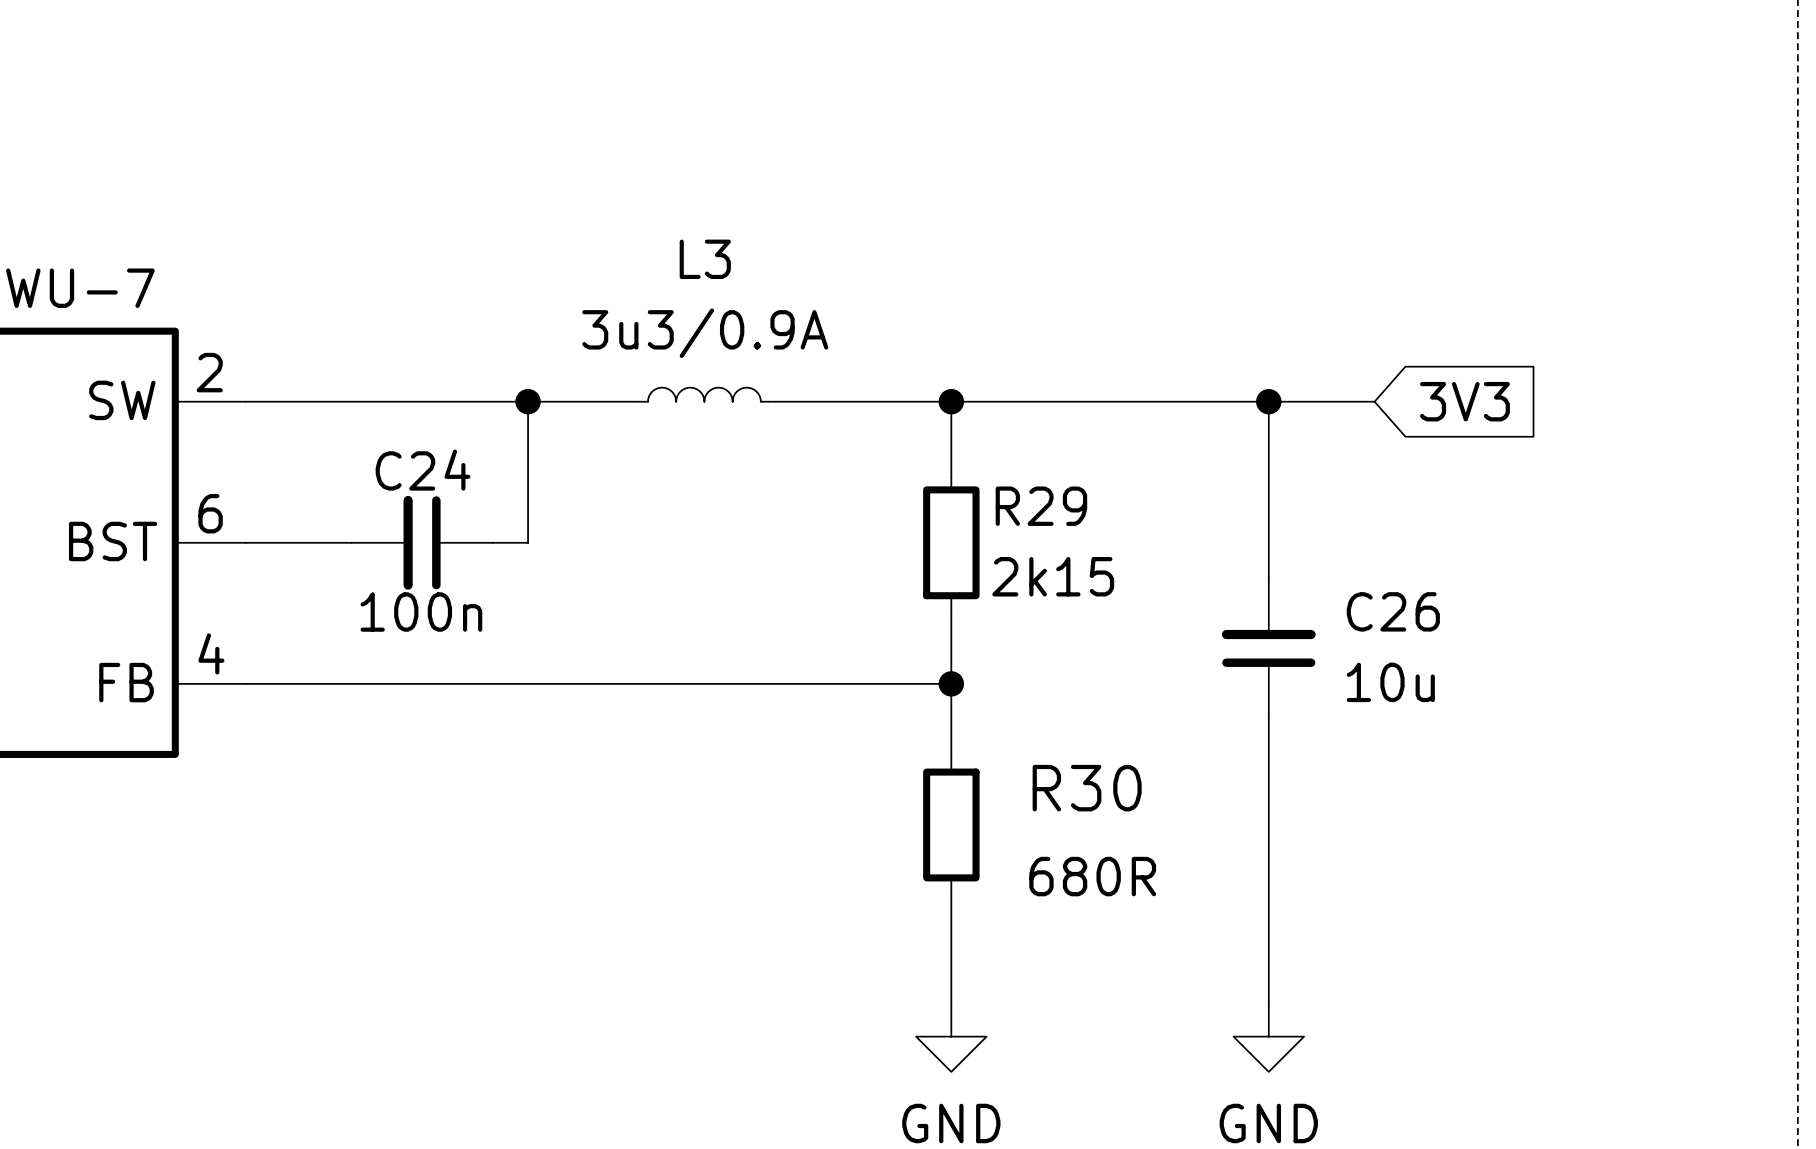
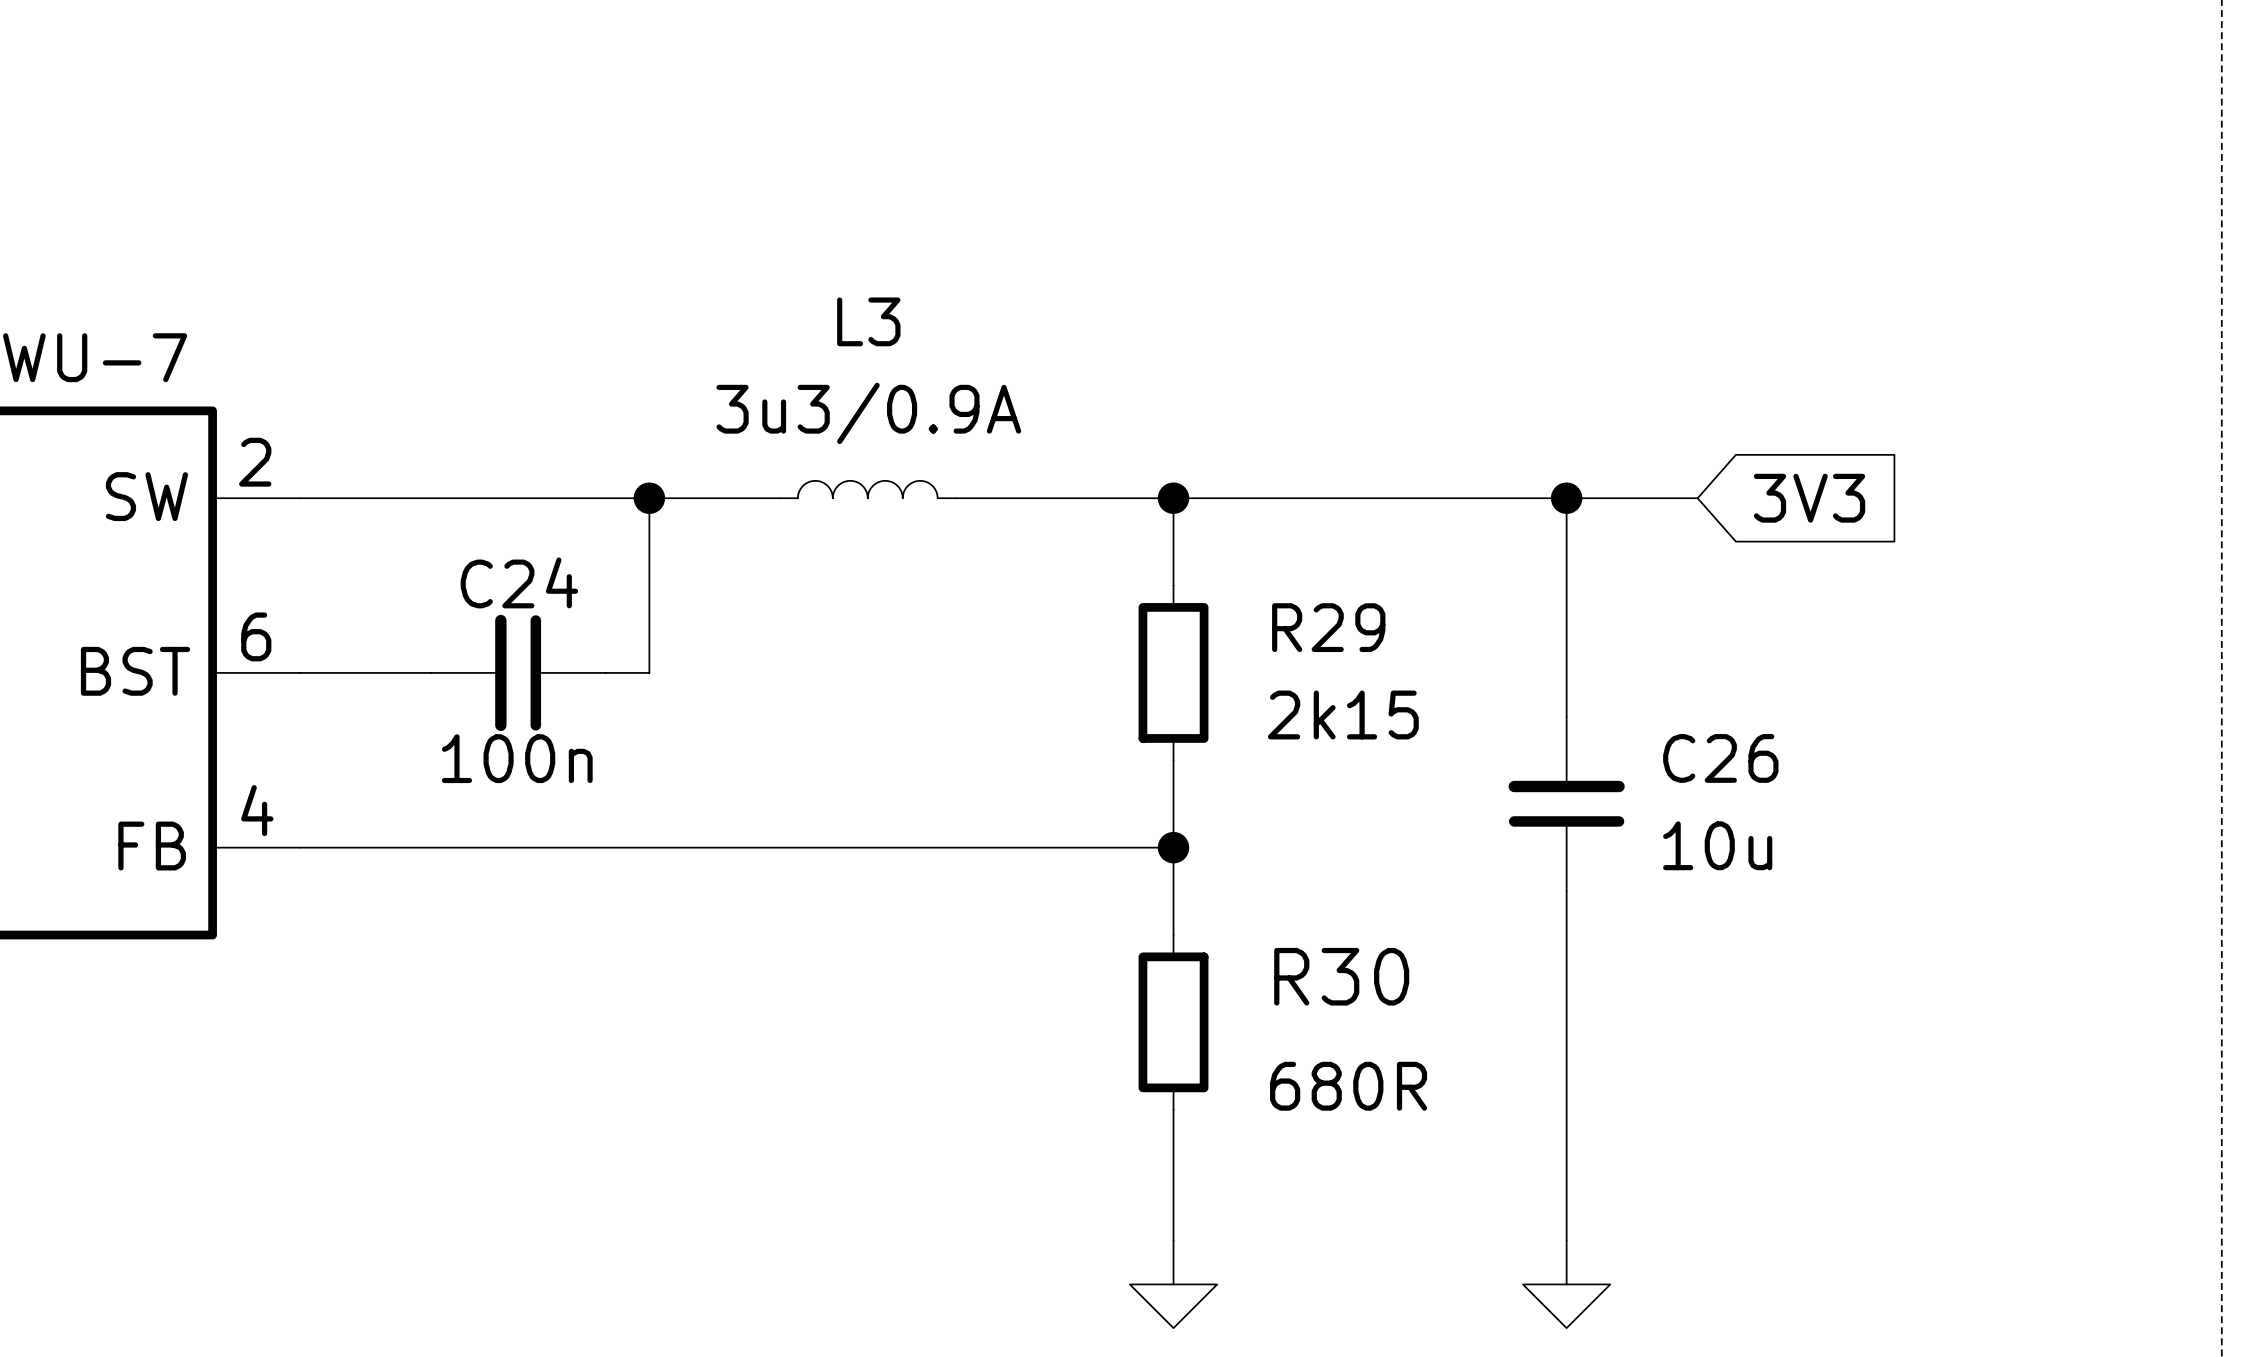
R29 name position: R29 (1041, 506) -> R29 (1328, 627)
R29 text position: 2k15 (1053, 576) -> 2k15 (1343, 714)

